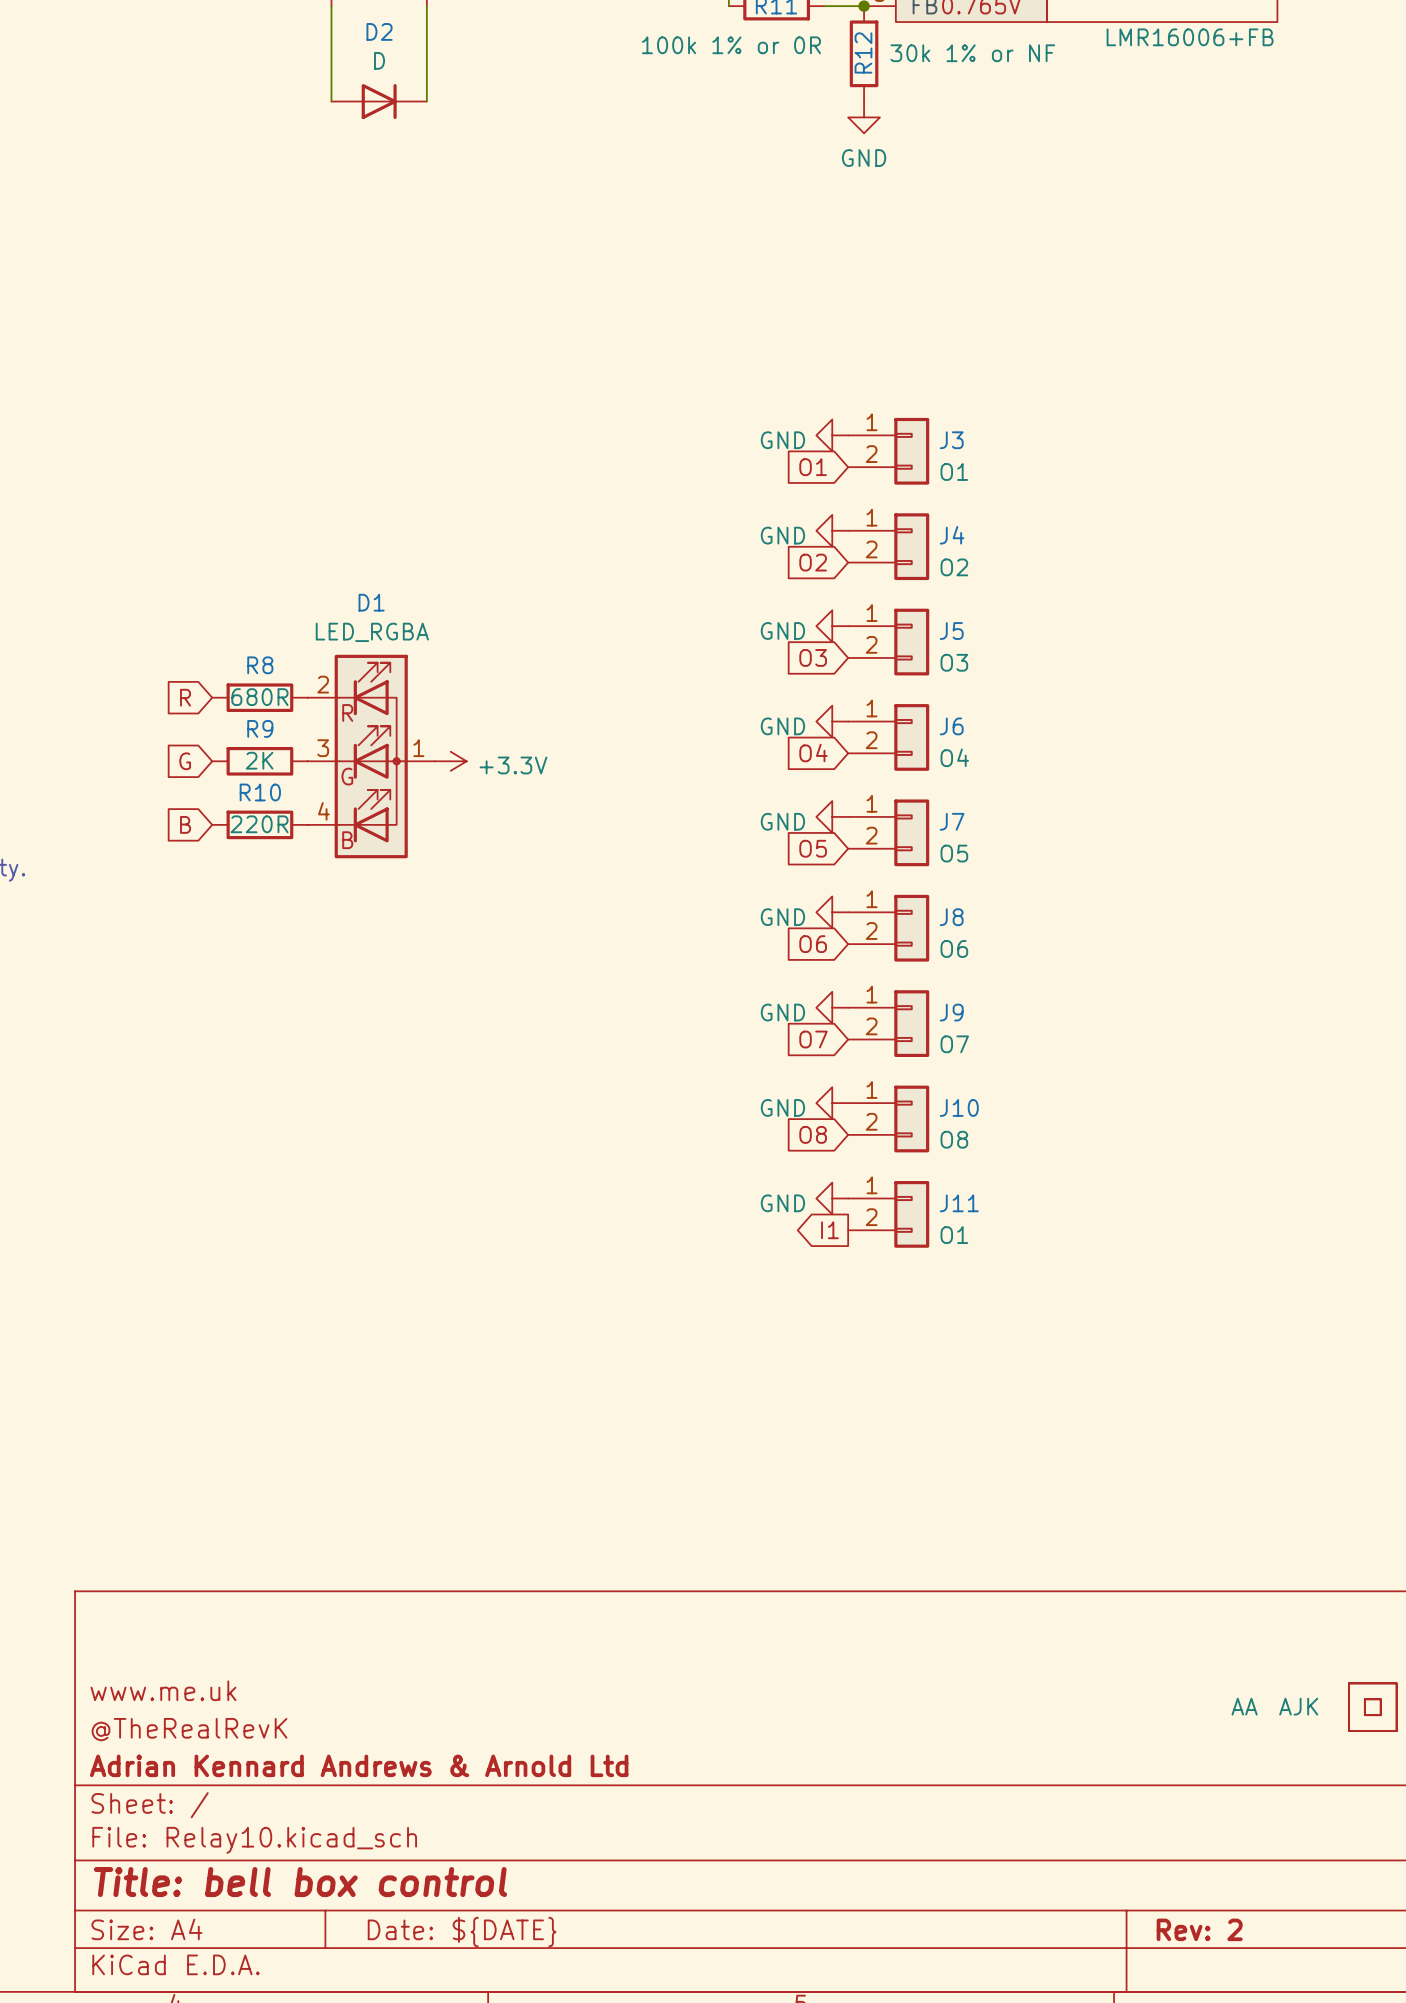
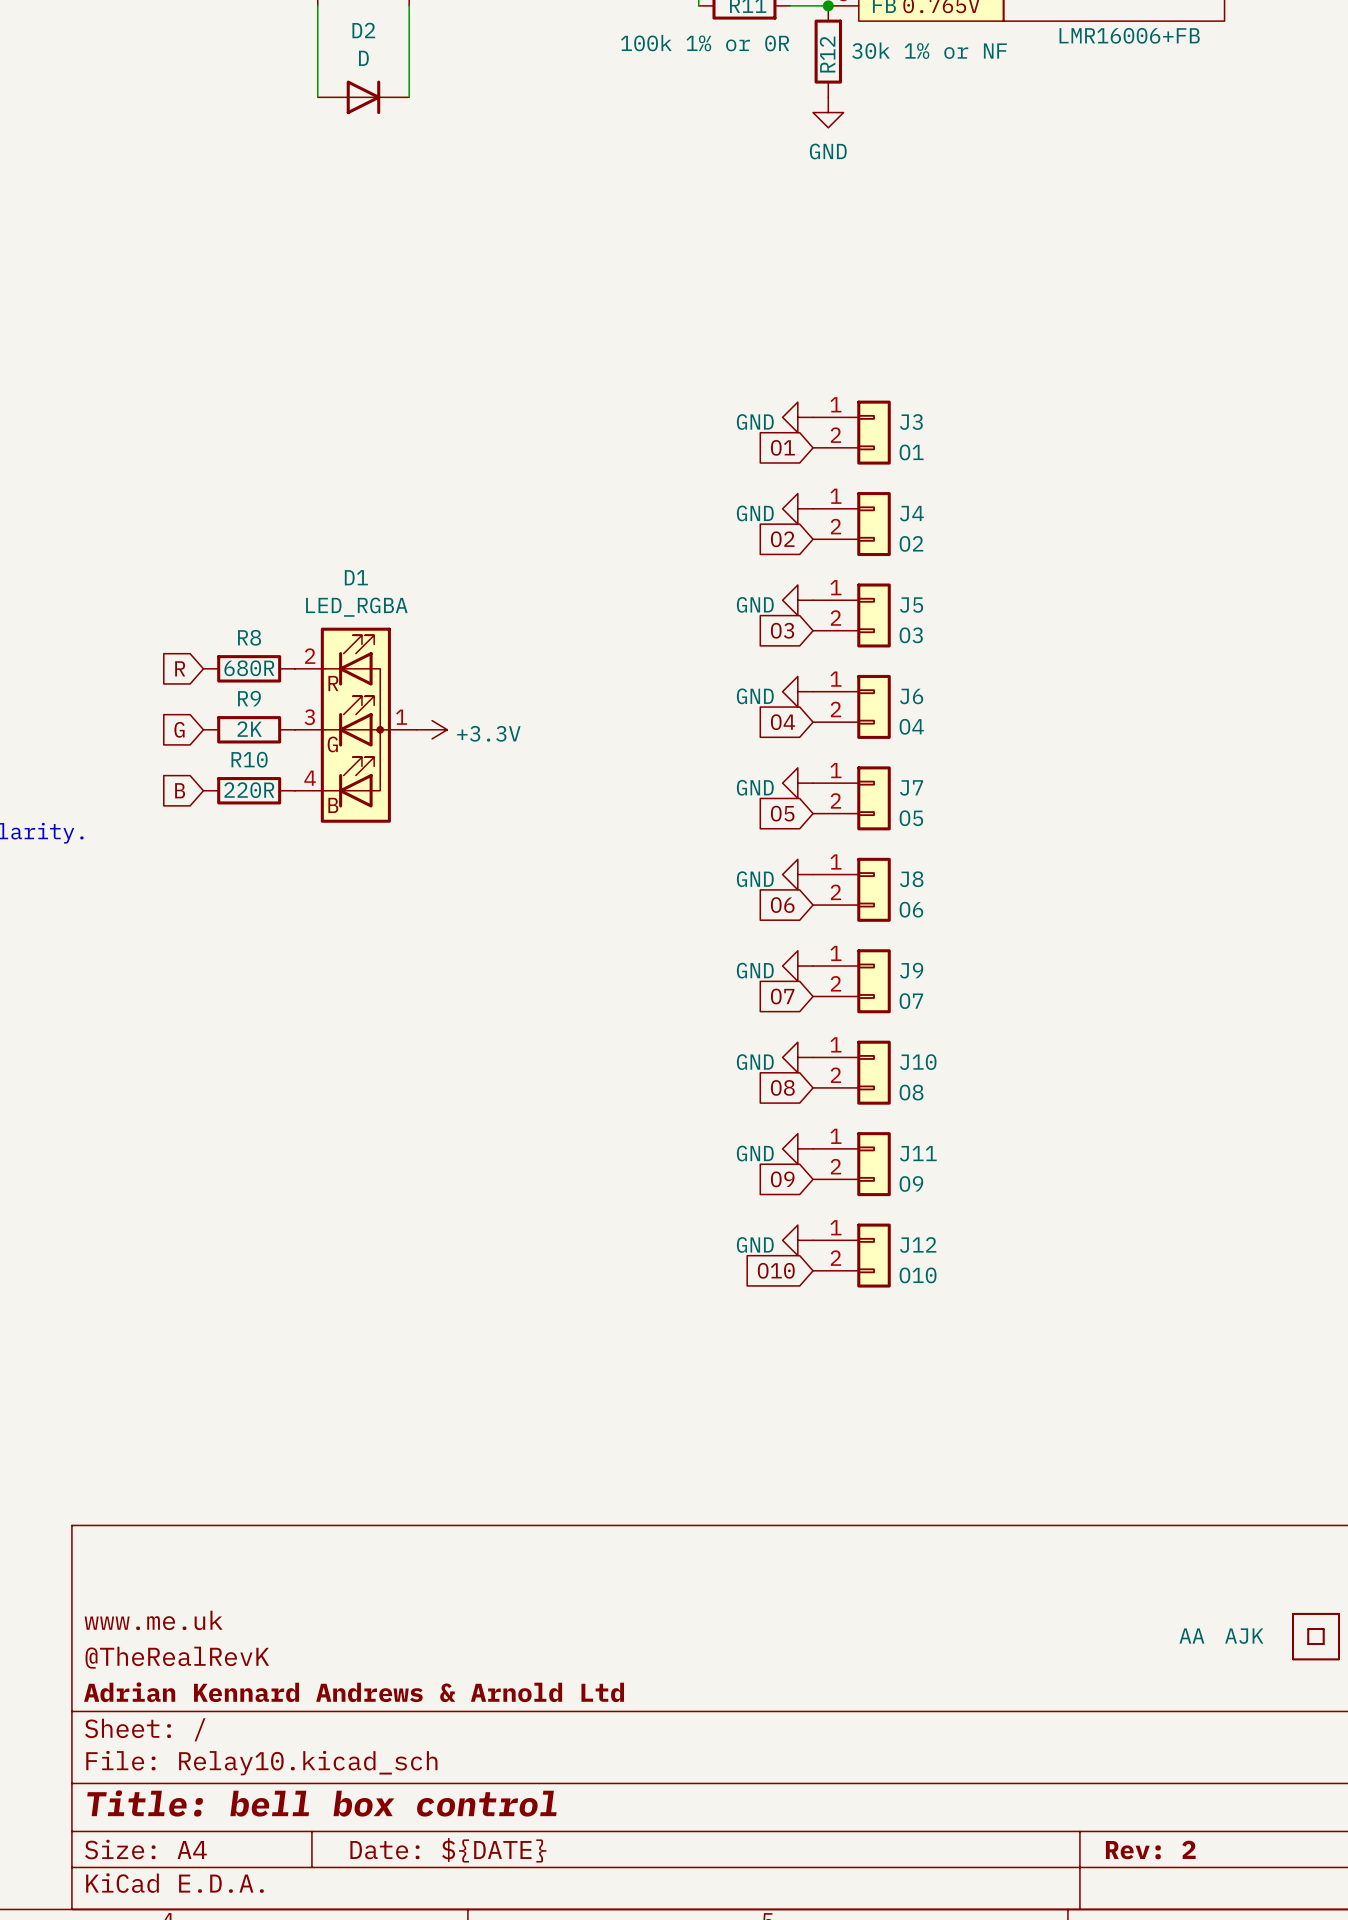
global label shape: output (829, 1230) -> input (782, 1179)
global label: I1 (829, 1230) -> O9 (782, 1179)
J11 value: O1 (954, 1235) -> O9 (911, 1183)
power symbol: none -> GND (797, 1240)
J12: none -> O10 (851, 1255)
global label: none -> O10 (776, 1270)

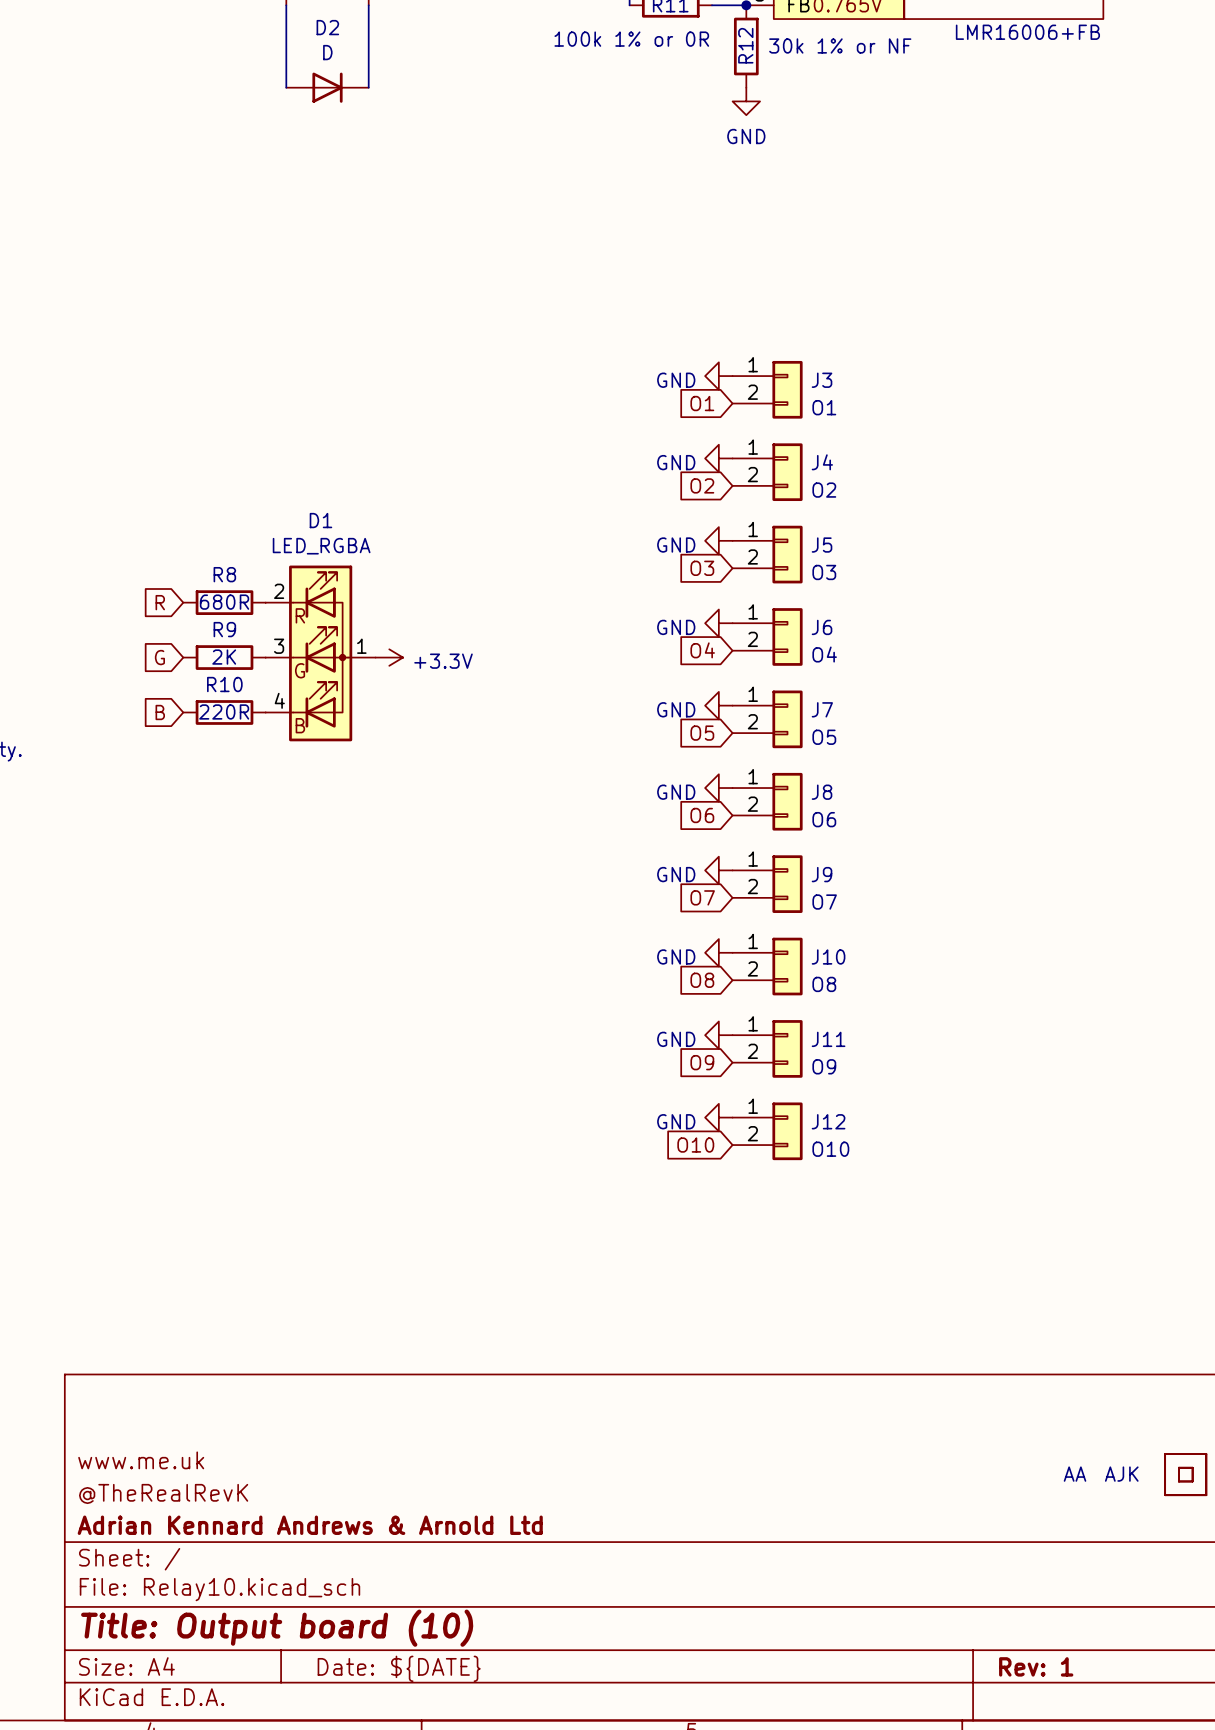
title block: Title: bell box control (321, 1803) -> Title: Output board (10) (277, 1628)
title block: Rev: 2 (1150, 1849) -> Rev: 1 (1036, 1666)

